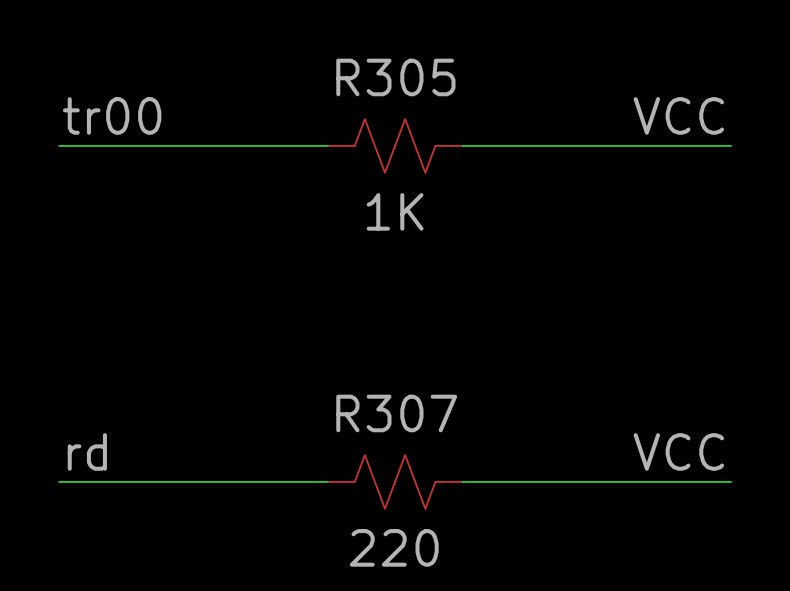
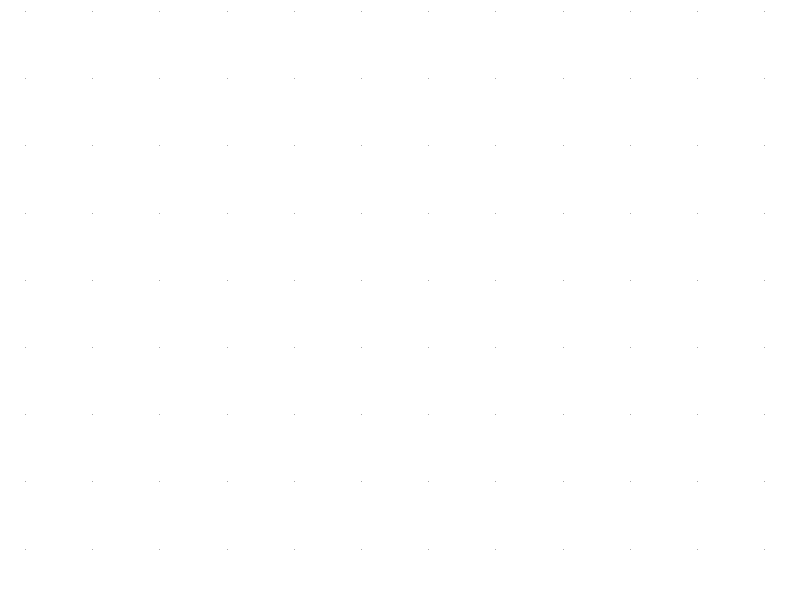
label: tr00 (112, 115) -> none
label: VCC (678, 115) -> none
wire: (59, 145) (327, 145) -> none
R305: 1K (395, 145) -> none
wire: (462, 145) (731, 145) -> none
label: rd (87, 451) -> none
label: VCC (678, 451) -> none
wire: (59, 481) (327, 481) -> none
R307: 220 (395, 481) -> none
wire: (462, 481) (731, 481) -> none

